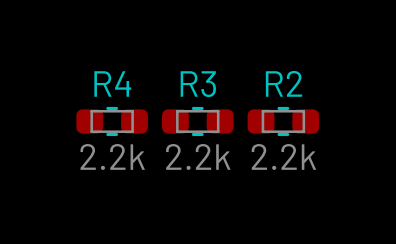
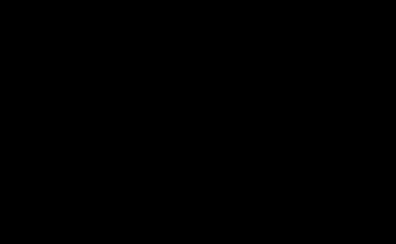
R4: 2.2k (112, 121) -> none
R3: 2.2k (197, 121) -> none
R2: 2.2k (283, 121) -> none

